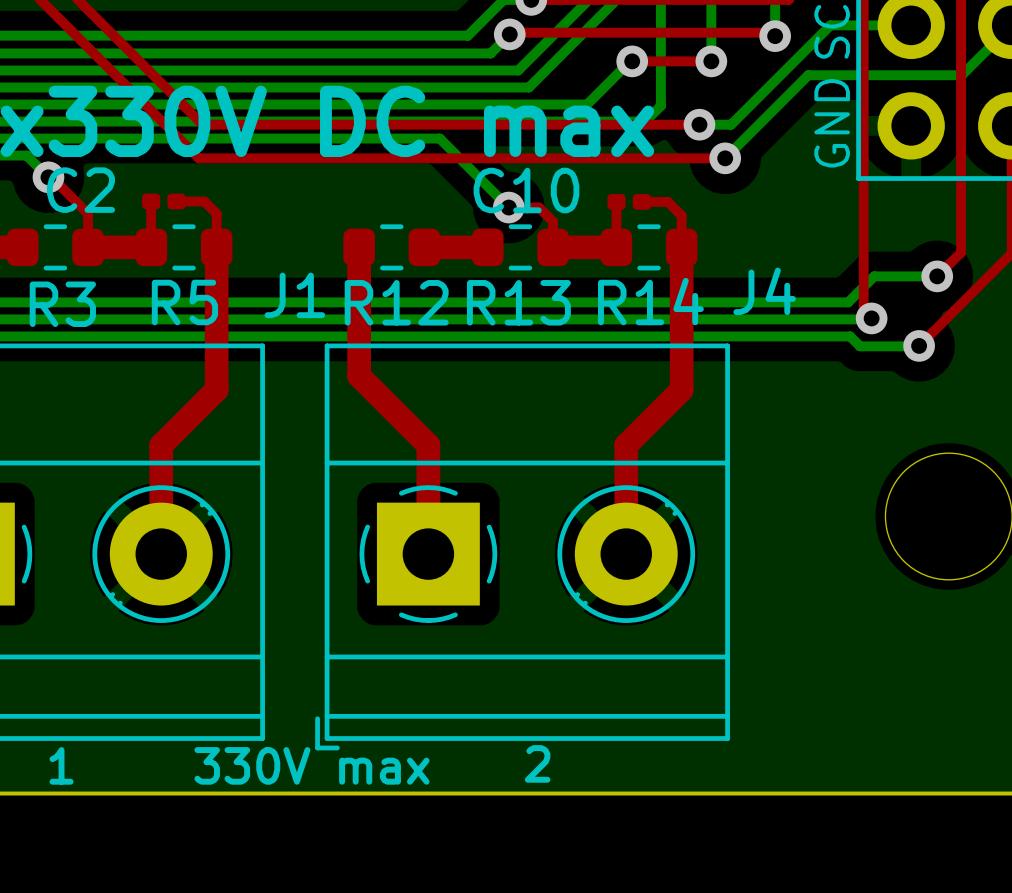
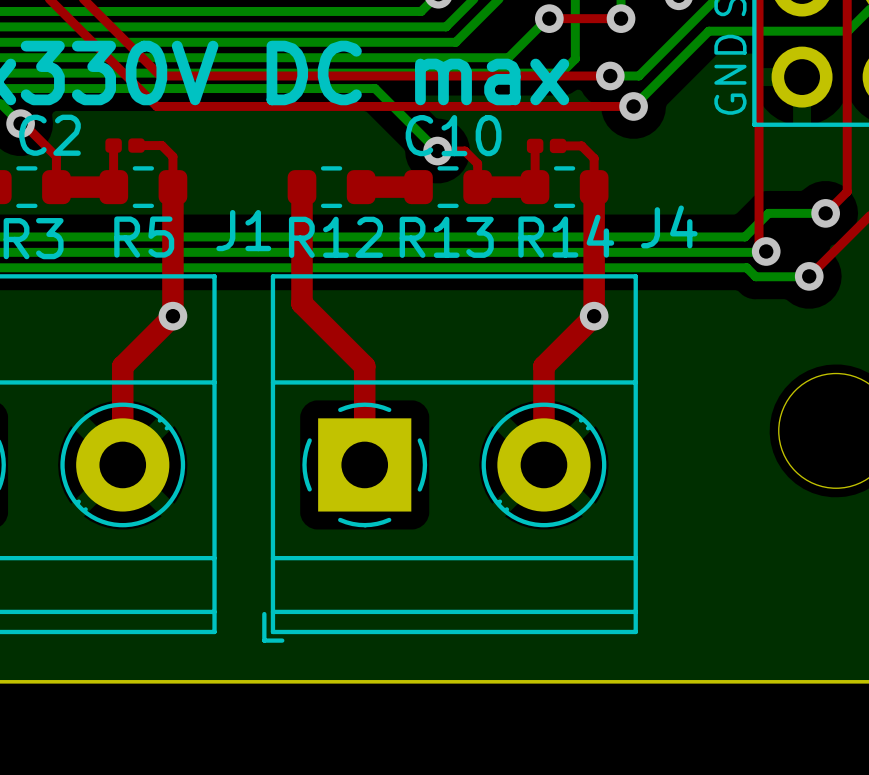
via: none -> (172, 316)
via: none -> (594, 316)
text: 2 (537, 763) -> none
text: 1 (61, 765) -> none
text: 330V max (311, 765) -> none

